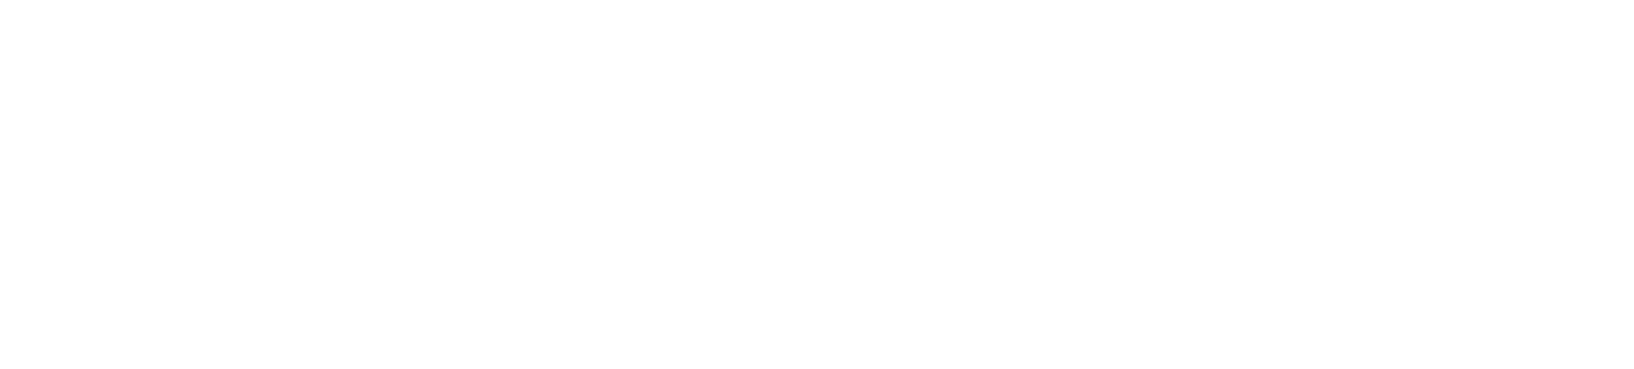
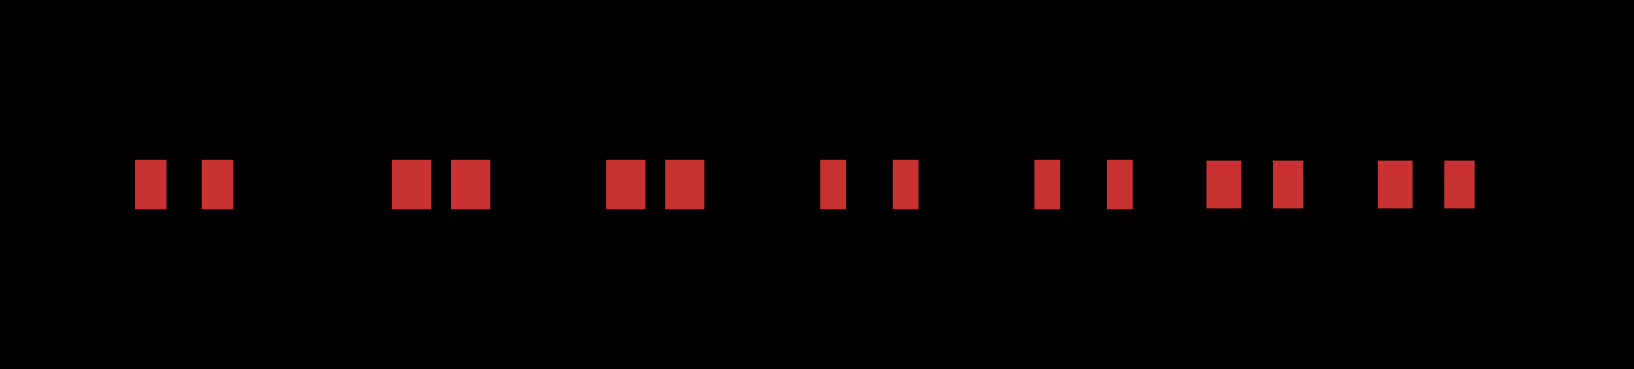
part: none -> (184, 184)
part: none -> (441, 184)
part: none -> (655, 184)
part: none -> (869, 184)
part: none -> (1083, 184)
part: none -> (1254, 184)
part: none -> (1426, 184)

